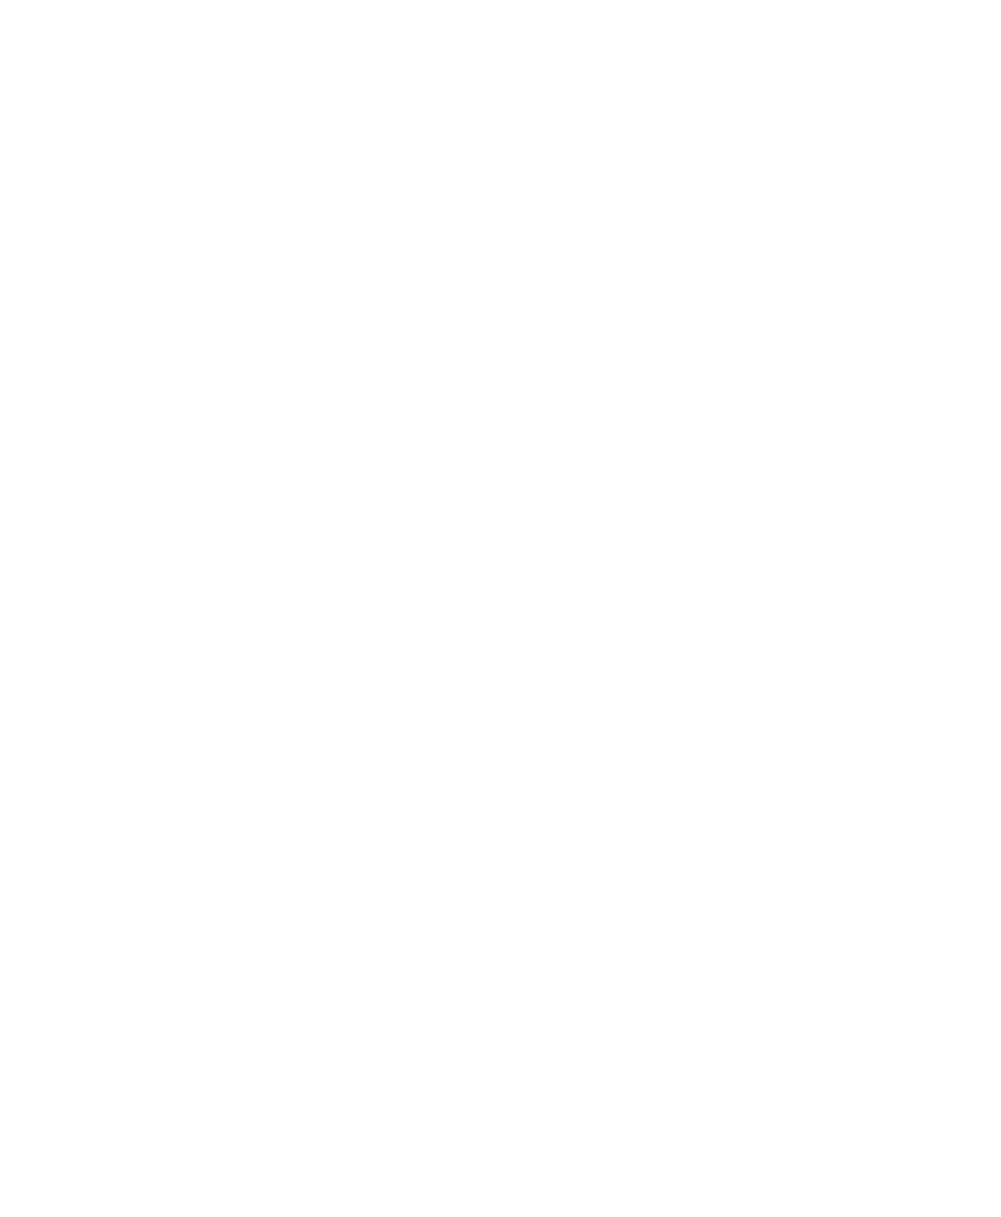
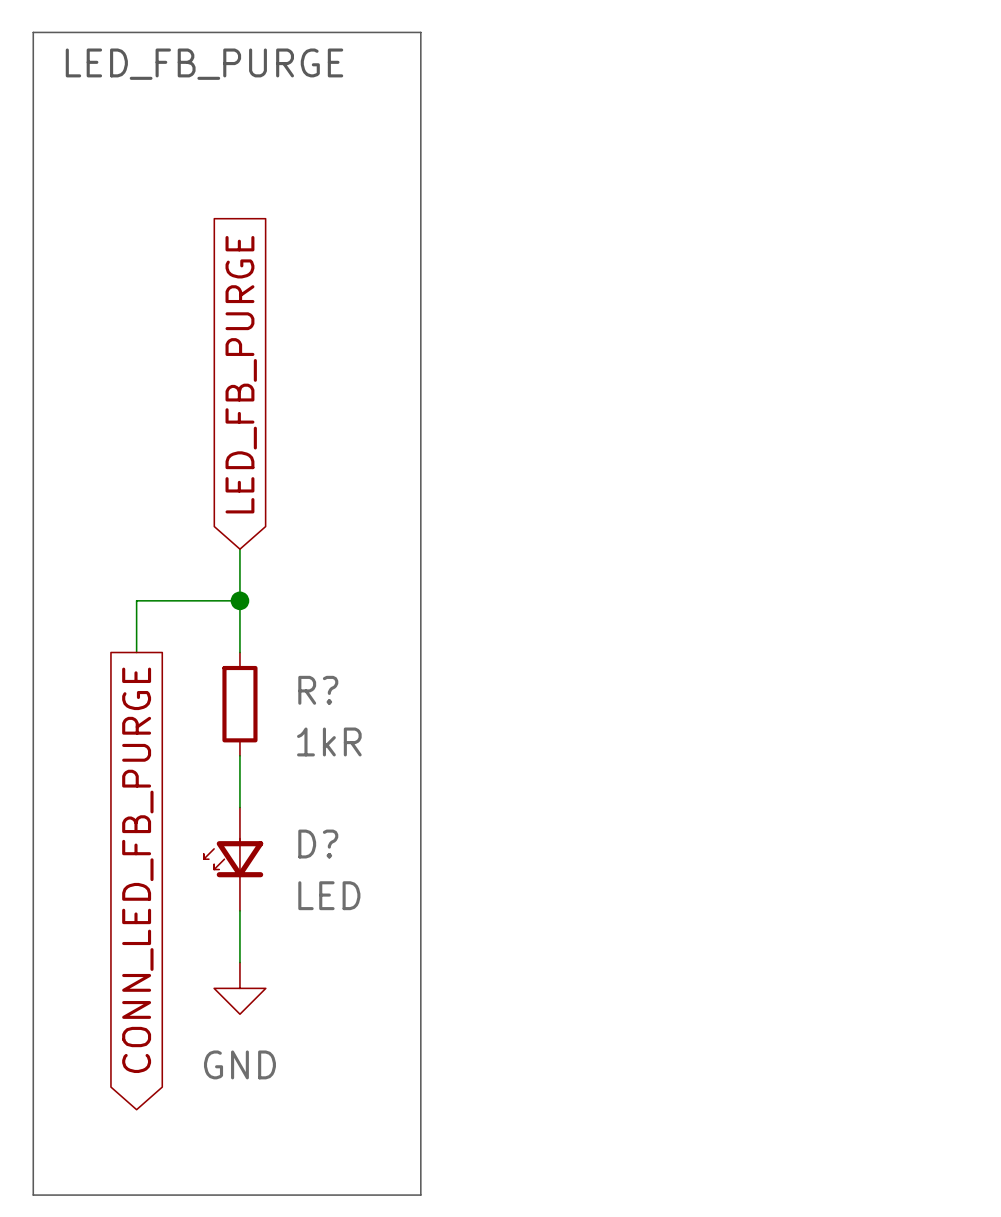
line: none -> (33, 32) (420, 32) (420, 1195) (33, 1195) (33, 32)
text: none -> LED_FB_PURGE (204, 64)
global label: none -> LED_FB_PURGE (241, 374)
wire: none -> (239, 549) (239, 652)
wire: none -> (239, 600) (136, 600) (136, 652)
junction: none -> (239, 600)
R?: none -> 1kR (239, 704)
wire: none -> (239, 755) (239, 807)
D?: none -> LED (233, 859)
global label: none -> CONN_LED_FB_PURGE (137, 870)
wire: none -> (239, 910) (239, 962)
power symbol: none -> GND (239, 988)

